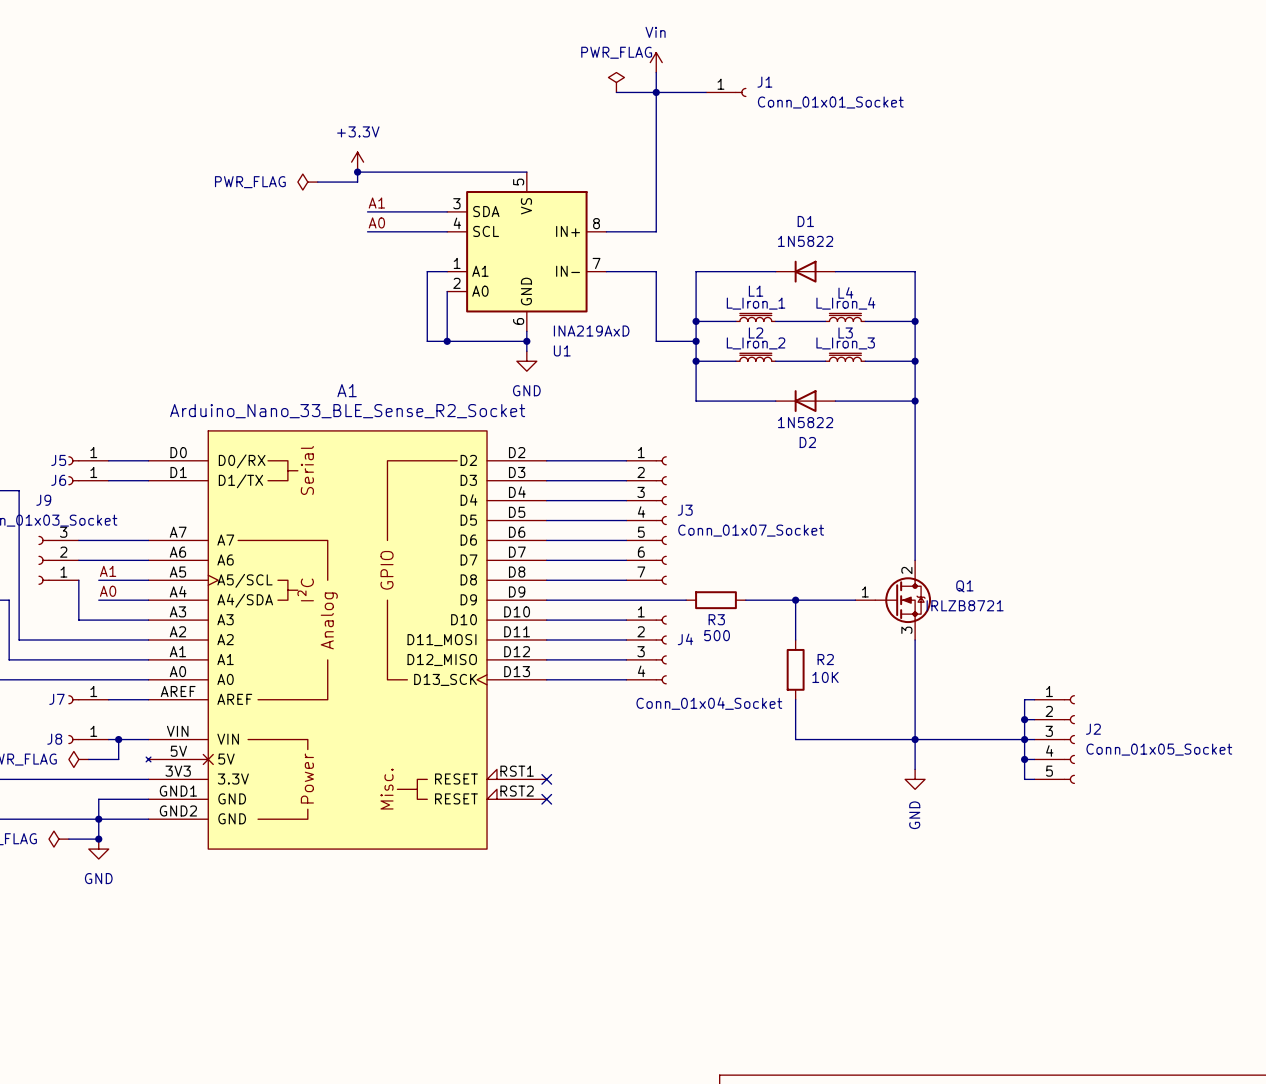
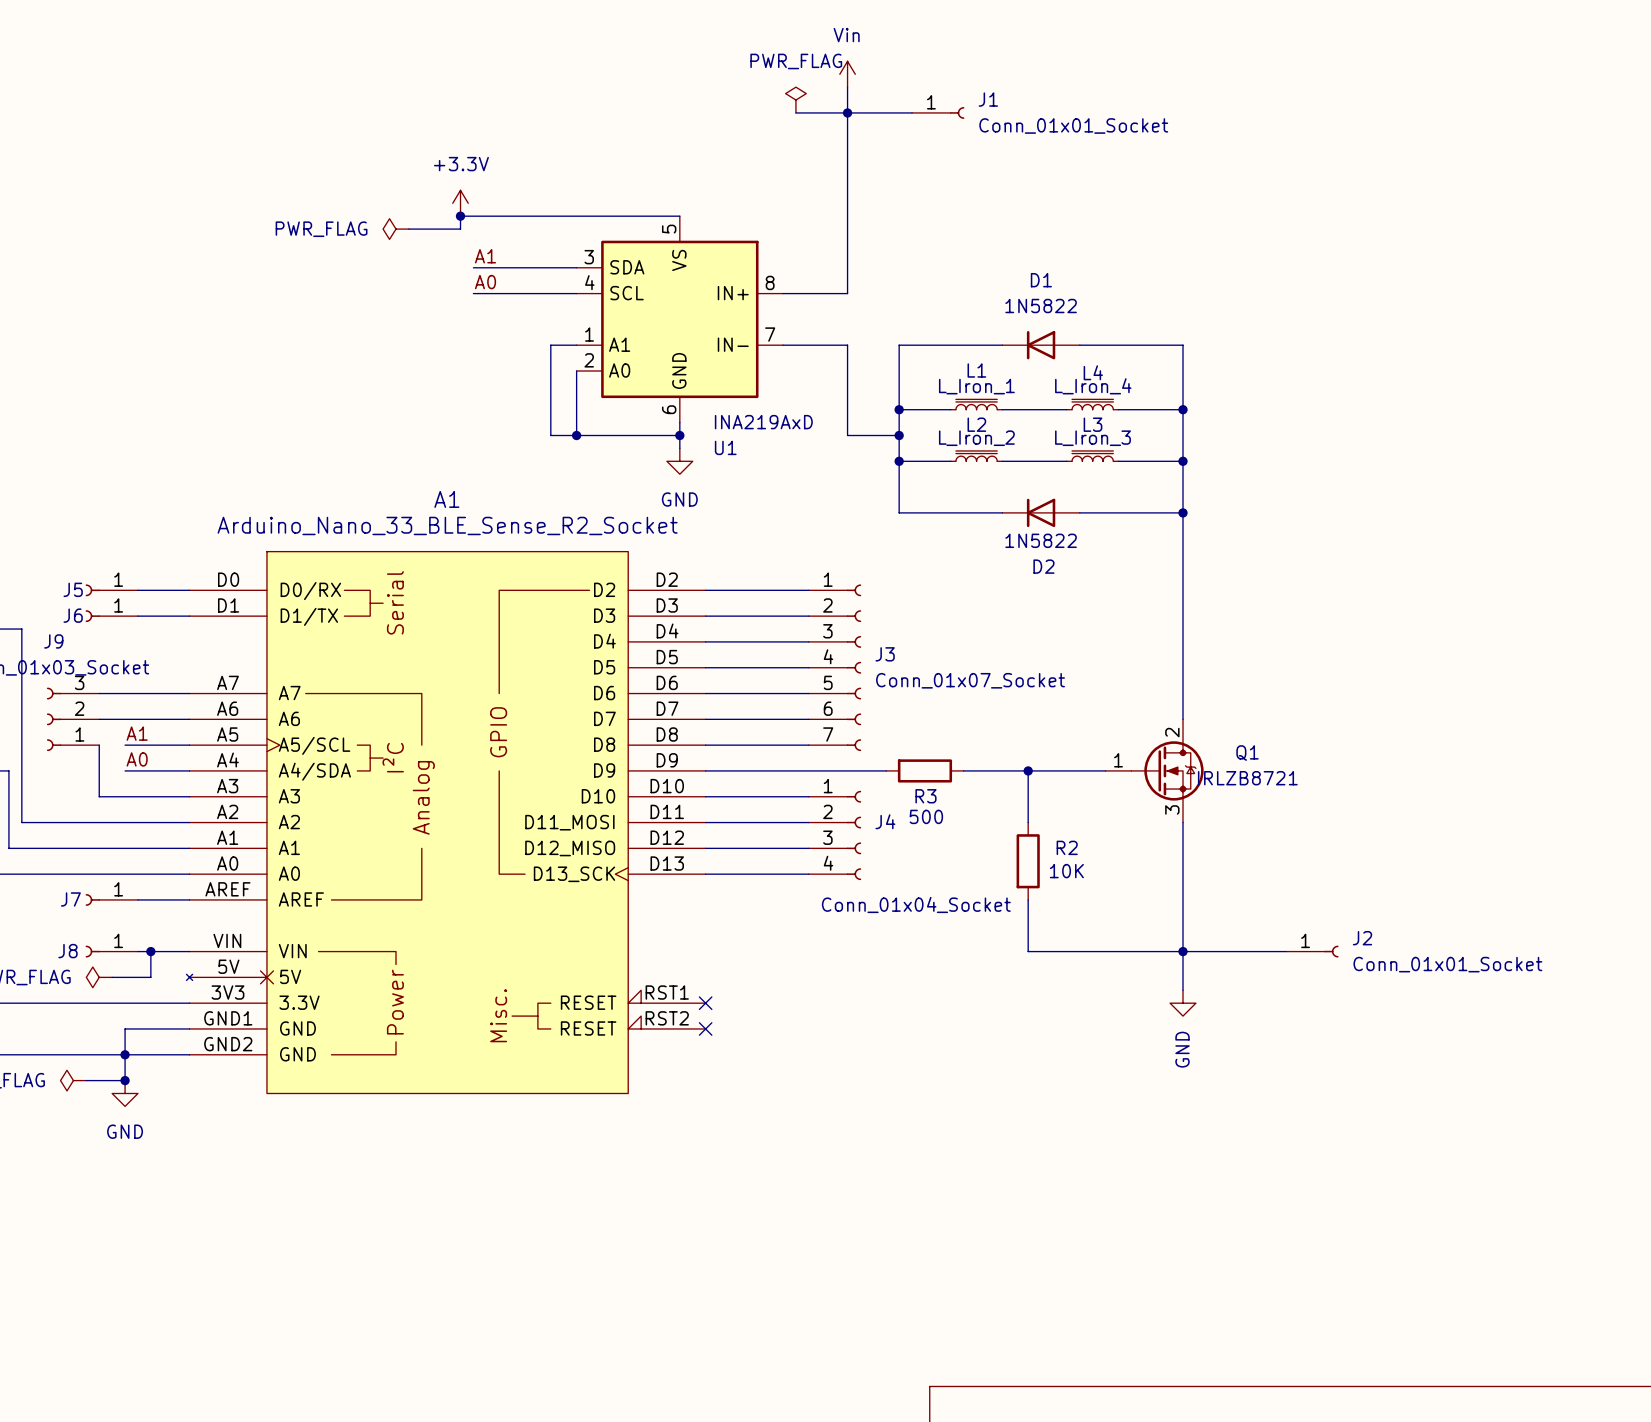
J2 symbol: [1034, 695, 1075, 784] -> [1286, 945, 1339, 958]
wire: (1034, 699) (1024, 699) (1024, 779) (1034, 779) -> none
wire: (1024, 719) (1034, 719) -> none
junction: (1024, 719) -> none
junction: (1024, 739) -> none
J2 value: Conn_01x05_Socket (1159, 749) -> Conn_01x01_Socket (1447, 964)
wire: (1024, 759) (1034, 759) -> none
junction: (1024, 759) -> none

